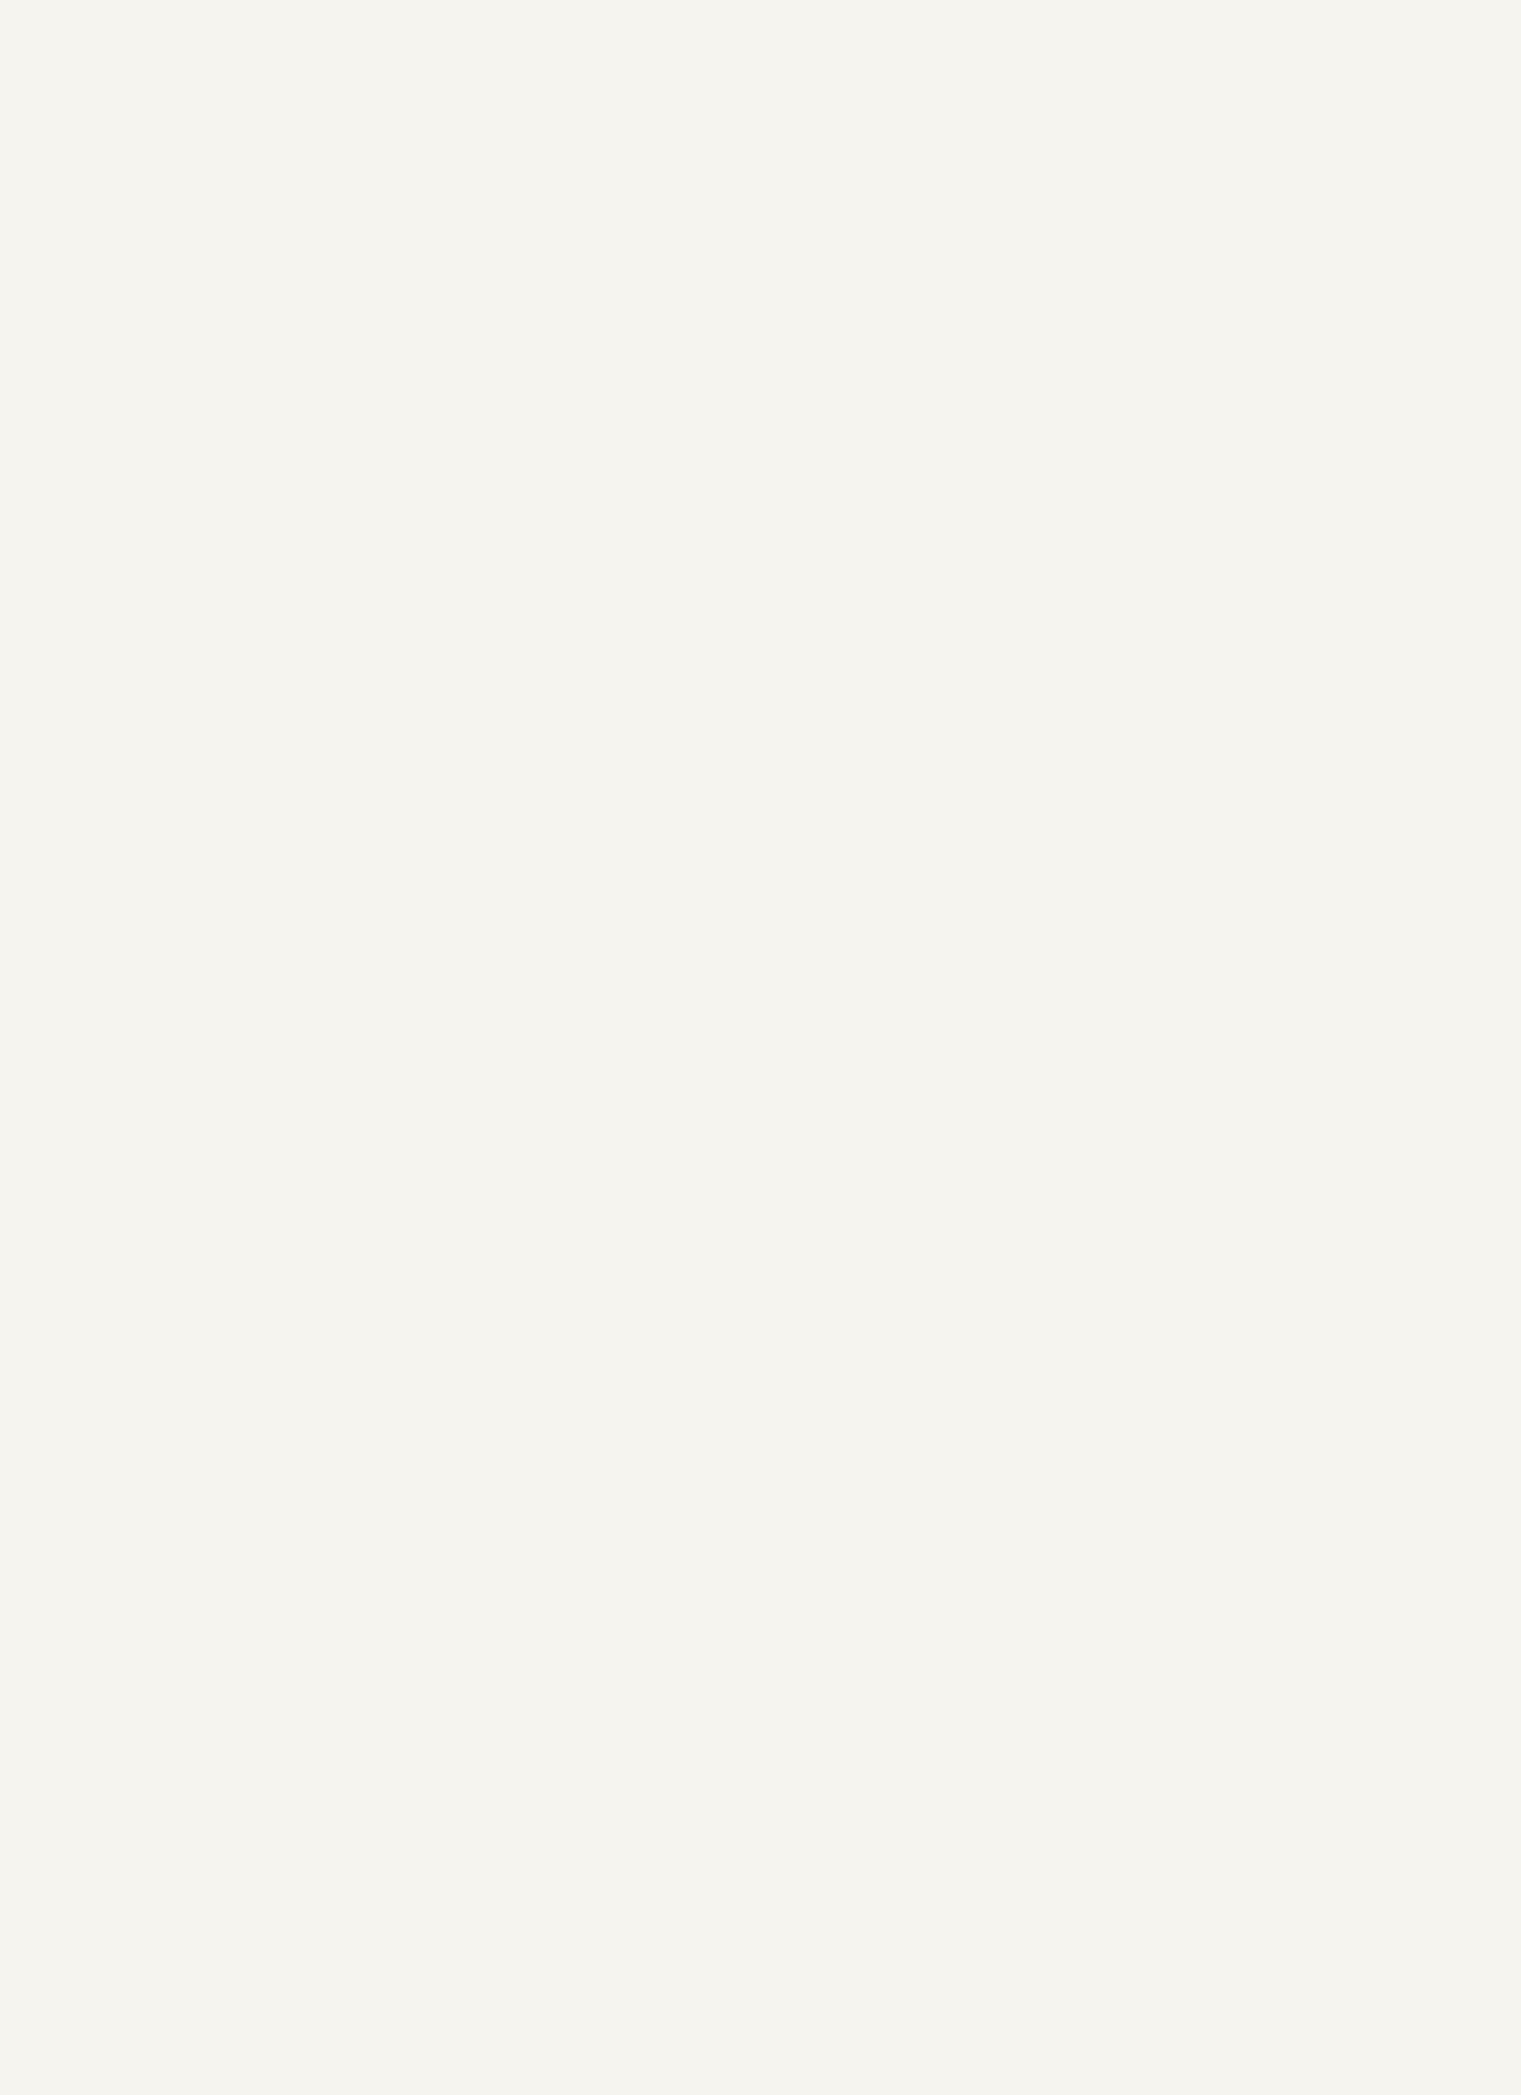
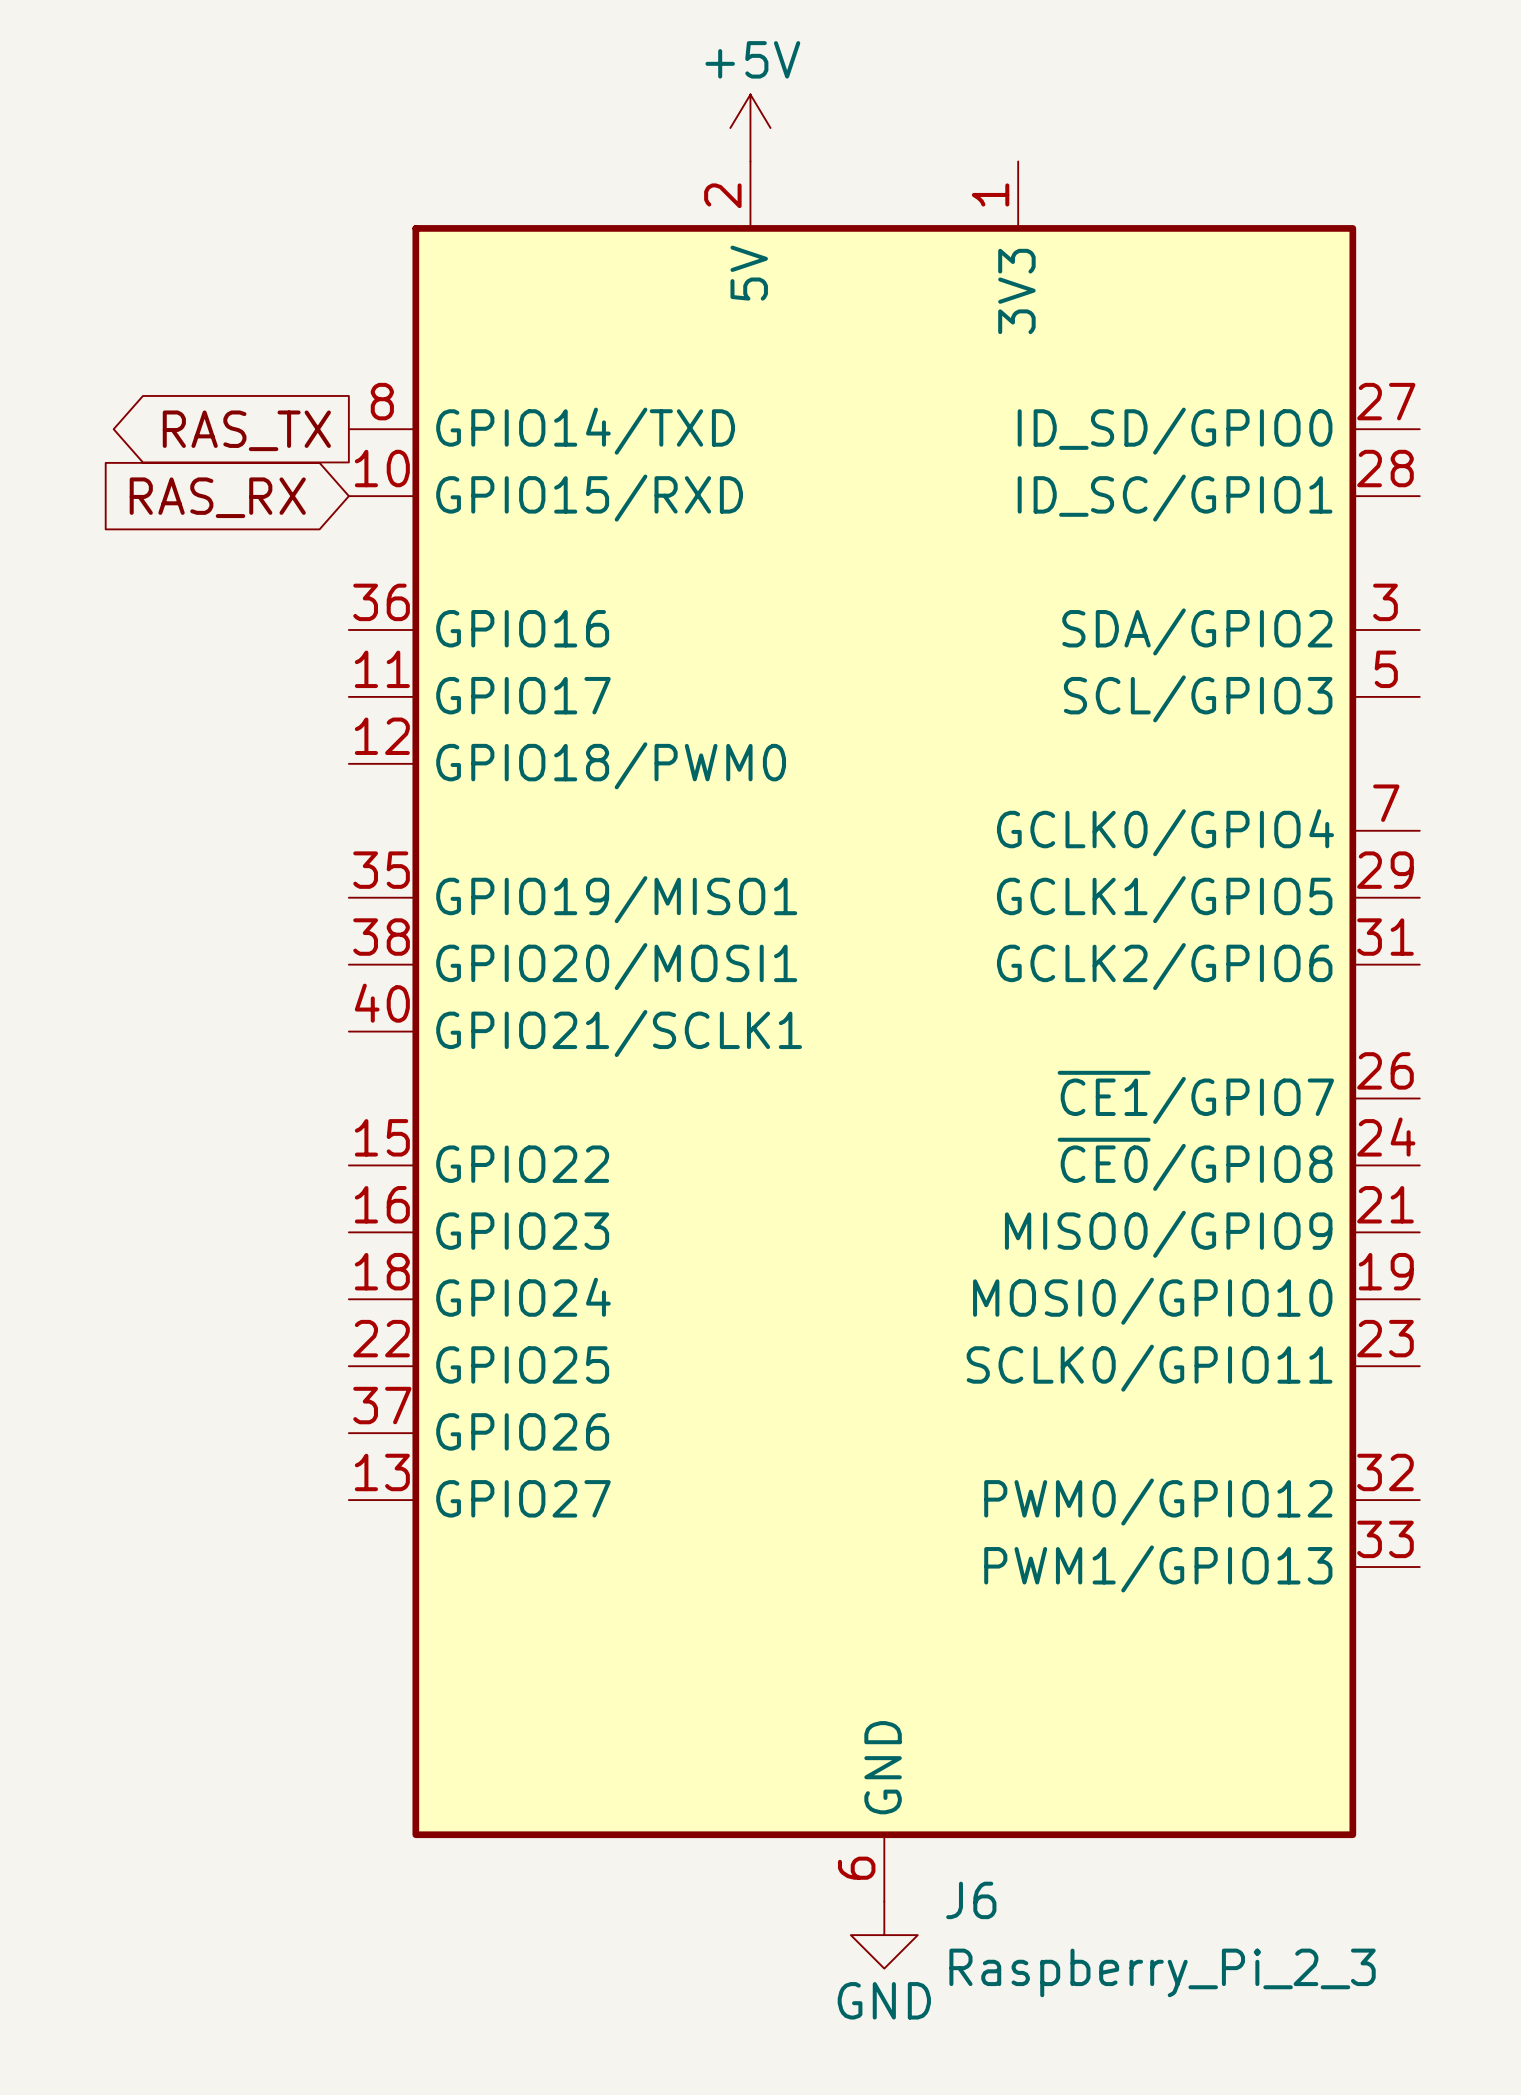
power symbol: none -> +5V (750, 128)
global label: none -> RAS_TX (246, 430)
global label: none -> RAS_RX (217, 497)
J6: none -> Raspberry_Pi_2_3 (884, 1031)
power symbol: none -> GND (884, 1935)

